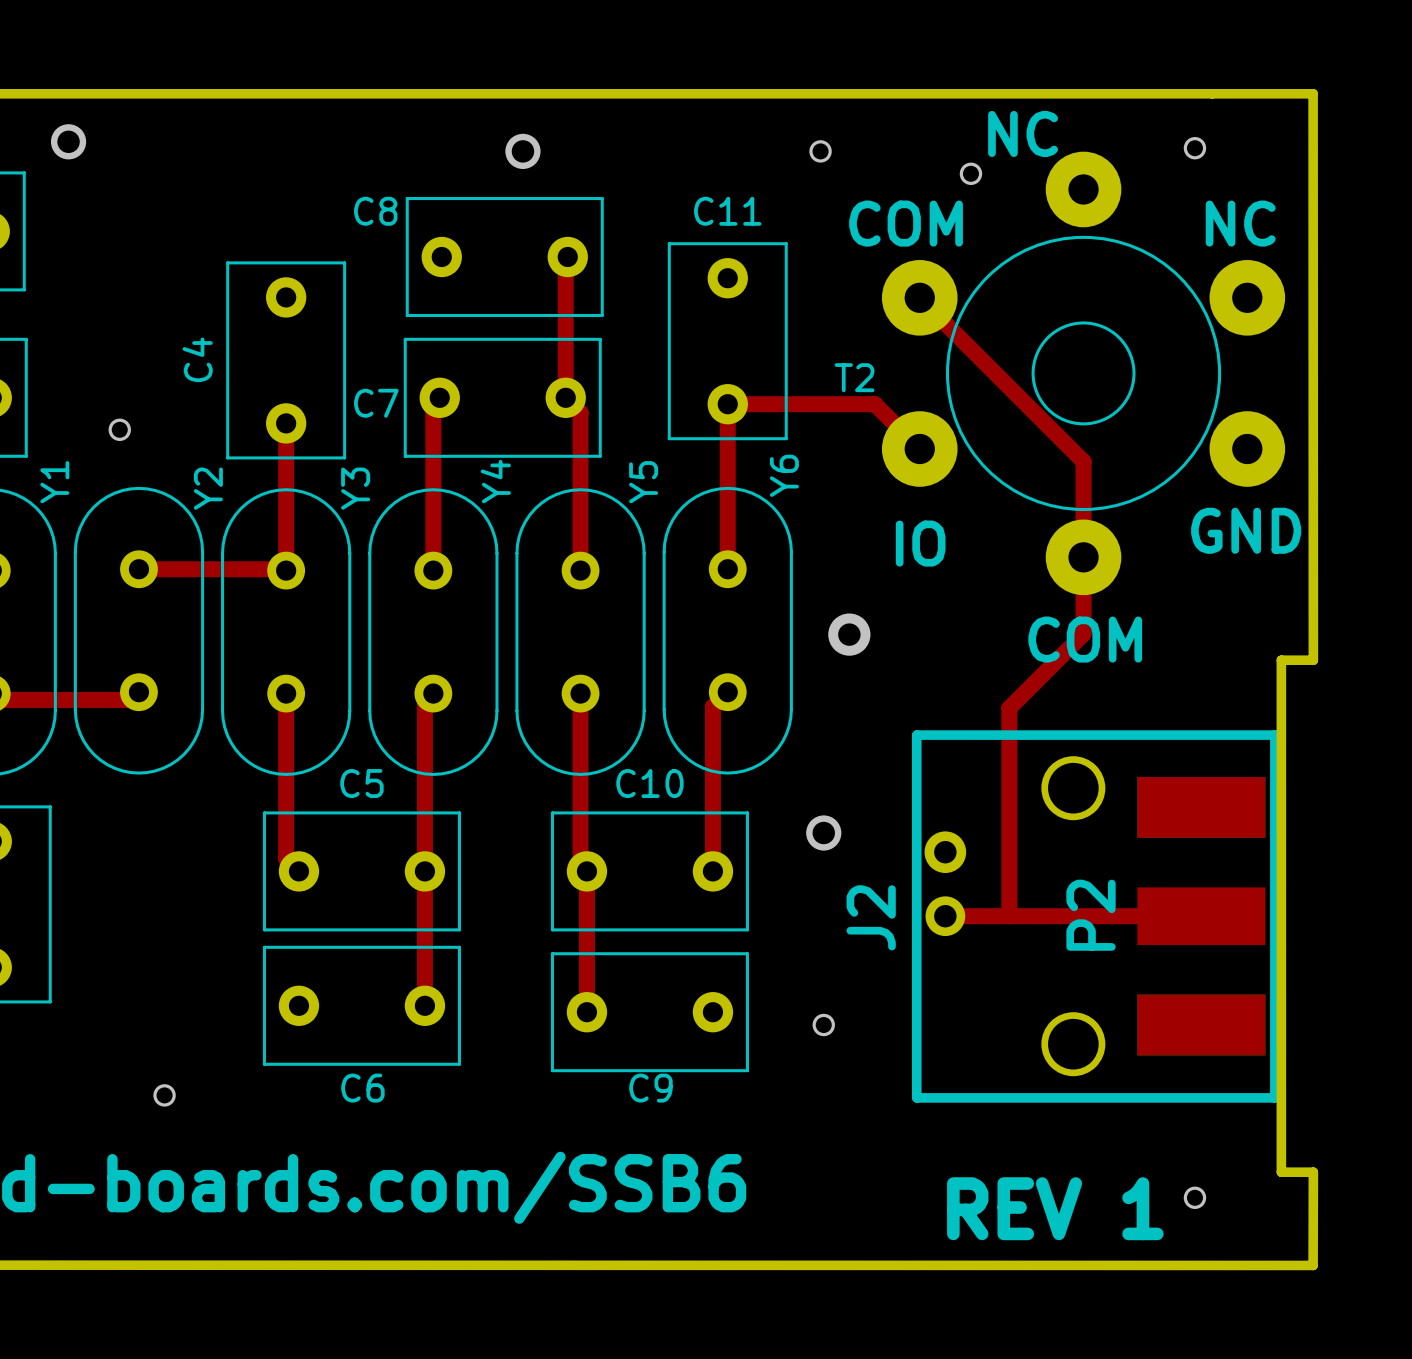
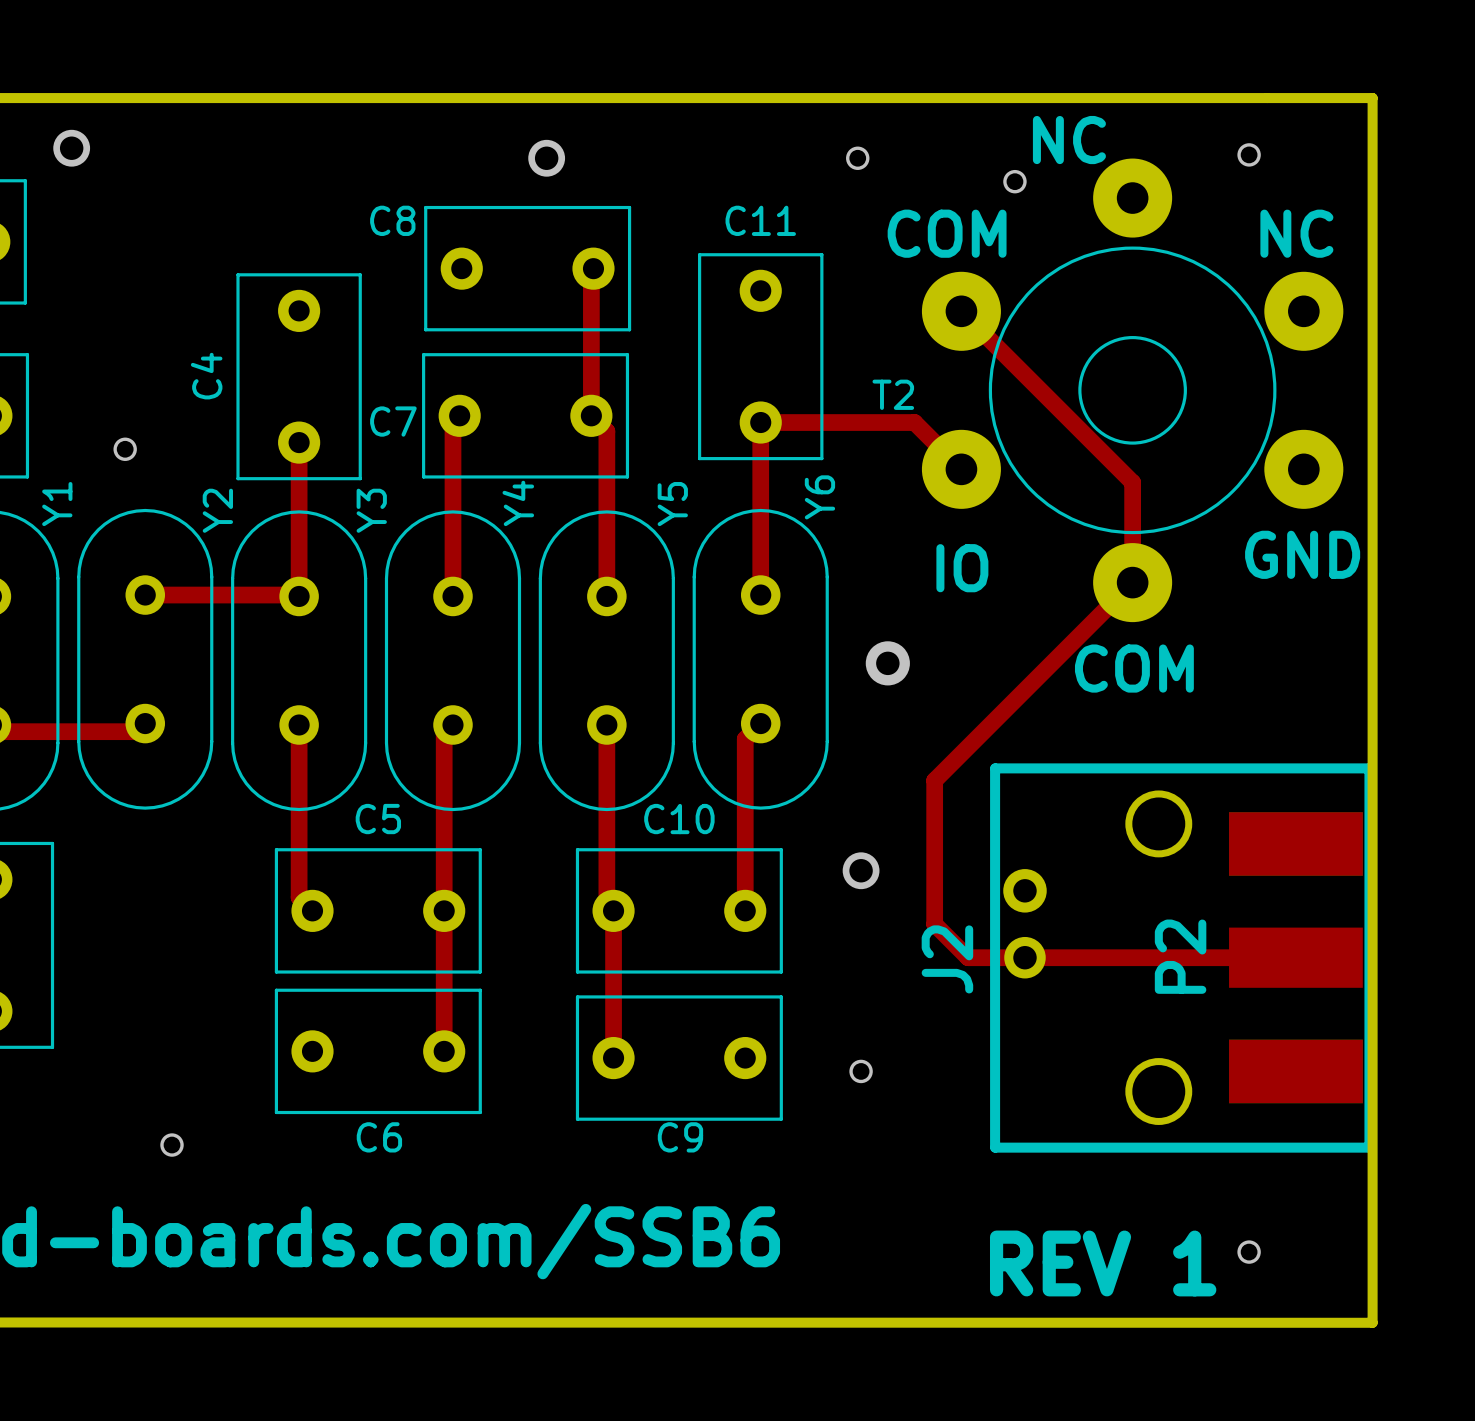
board edge: (1313, 93) (1313, 660) (1281, 660) (1281, 1172) (1313, 1172) (1313, 1265) -> (1372, 98) (1372, 1322)
top track: (1083, 557) (1083, 634) (1009, 708) (1009, 916) -> (1132, 582) (934, 780) (934, 924) (968, 957) (988, 957)
J2 position: (1095, 916) -> (1182, 957)
P2 position: (1201, 916) -> (1295, 957)

